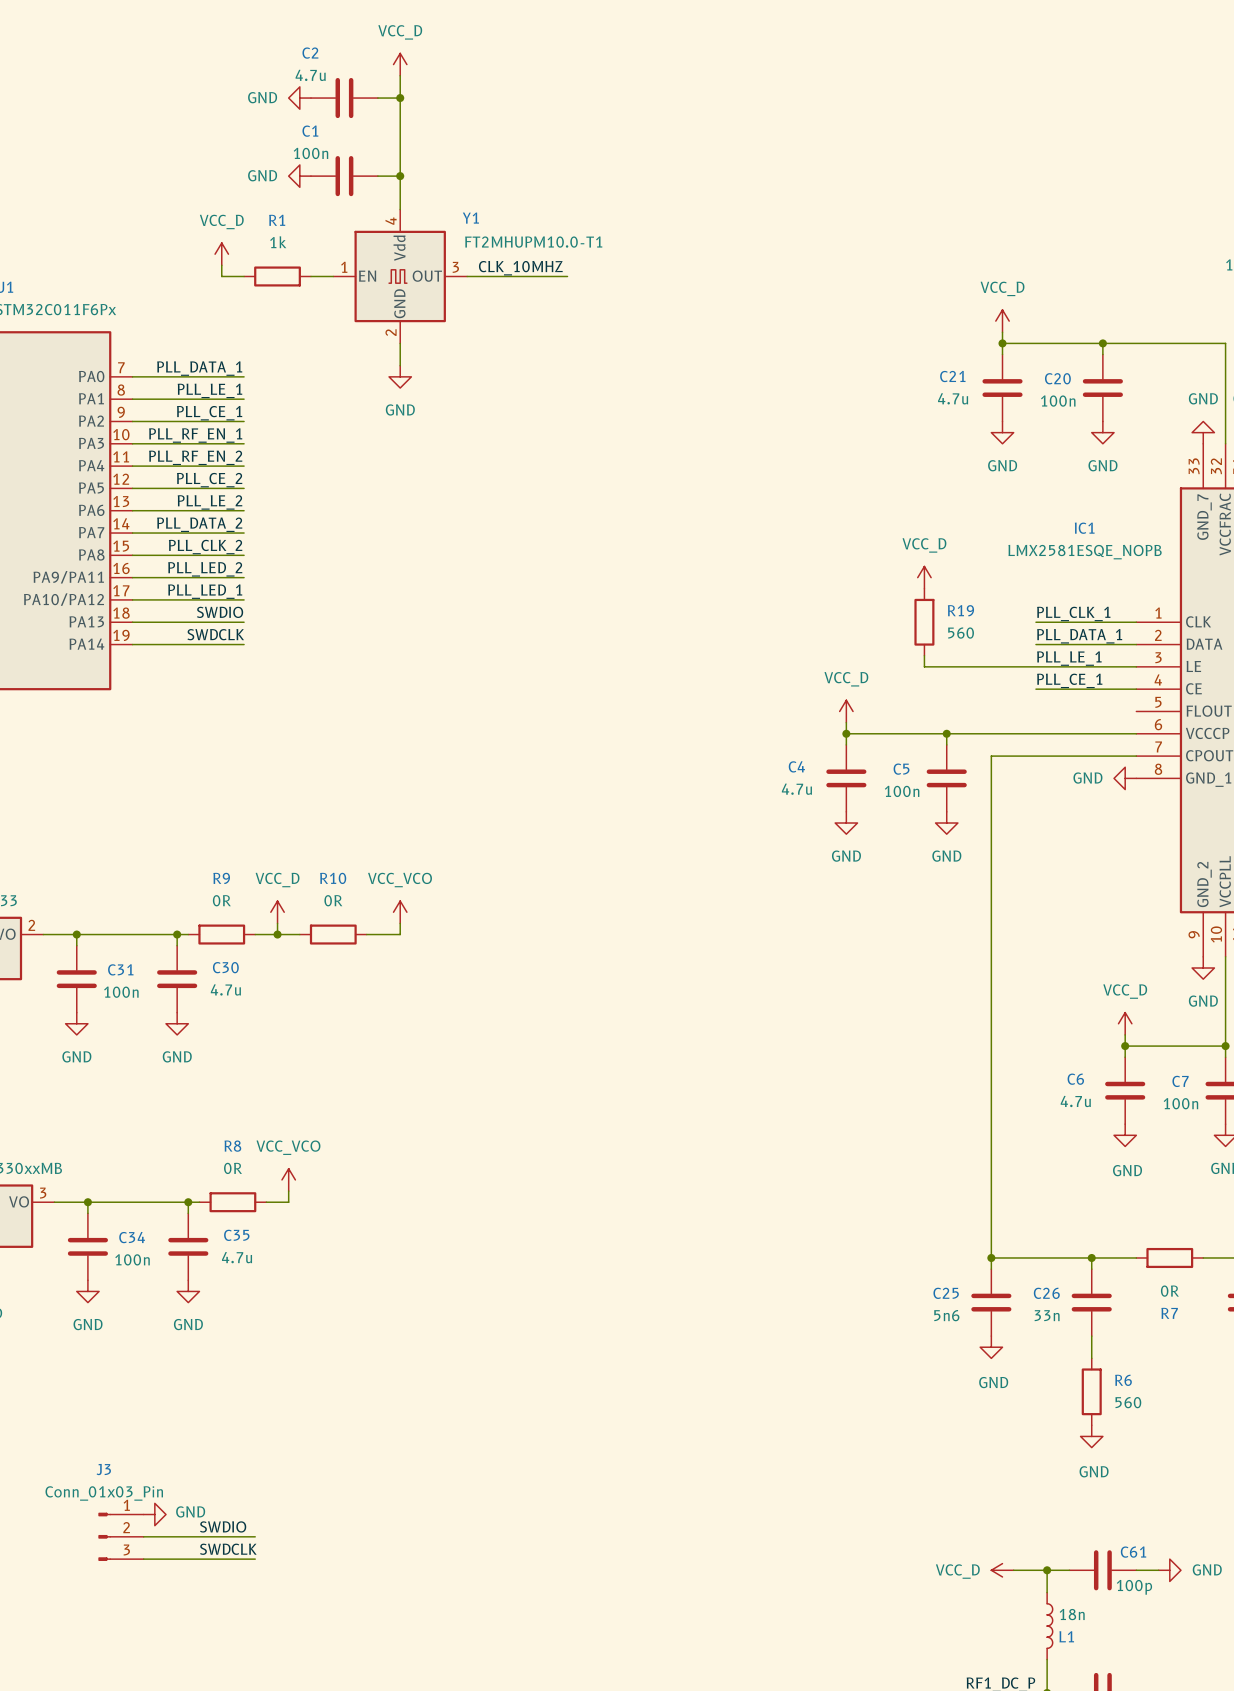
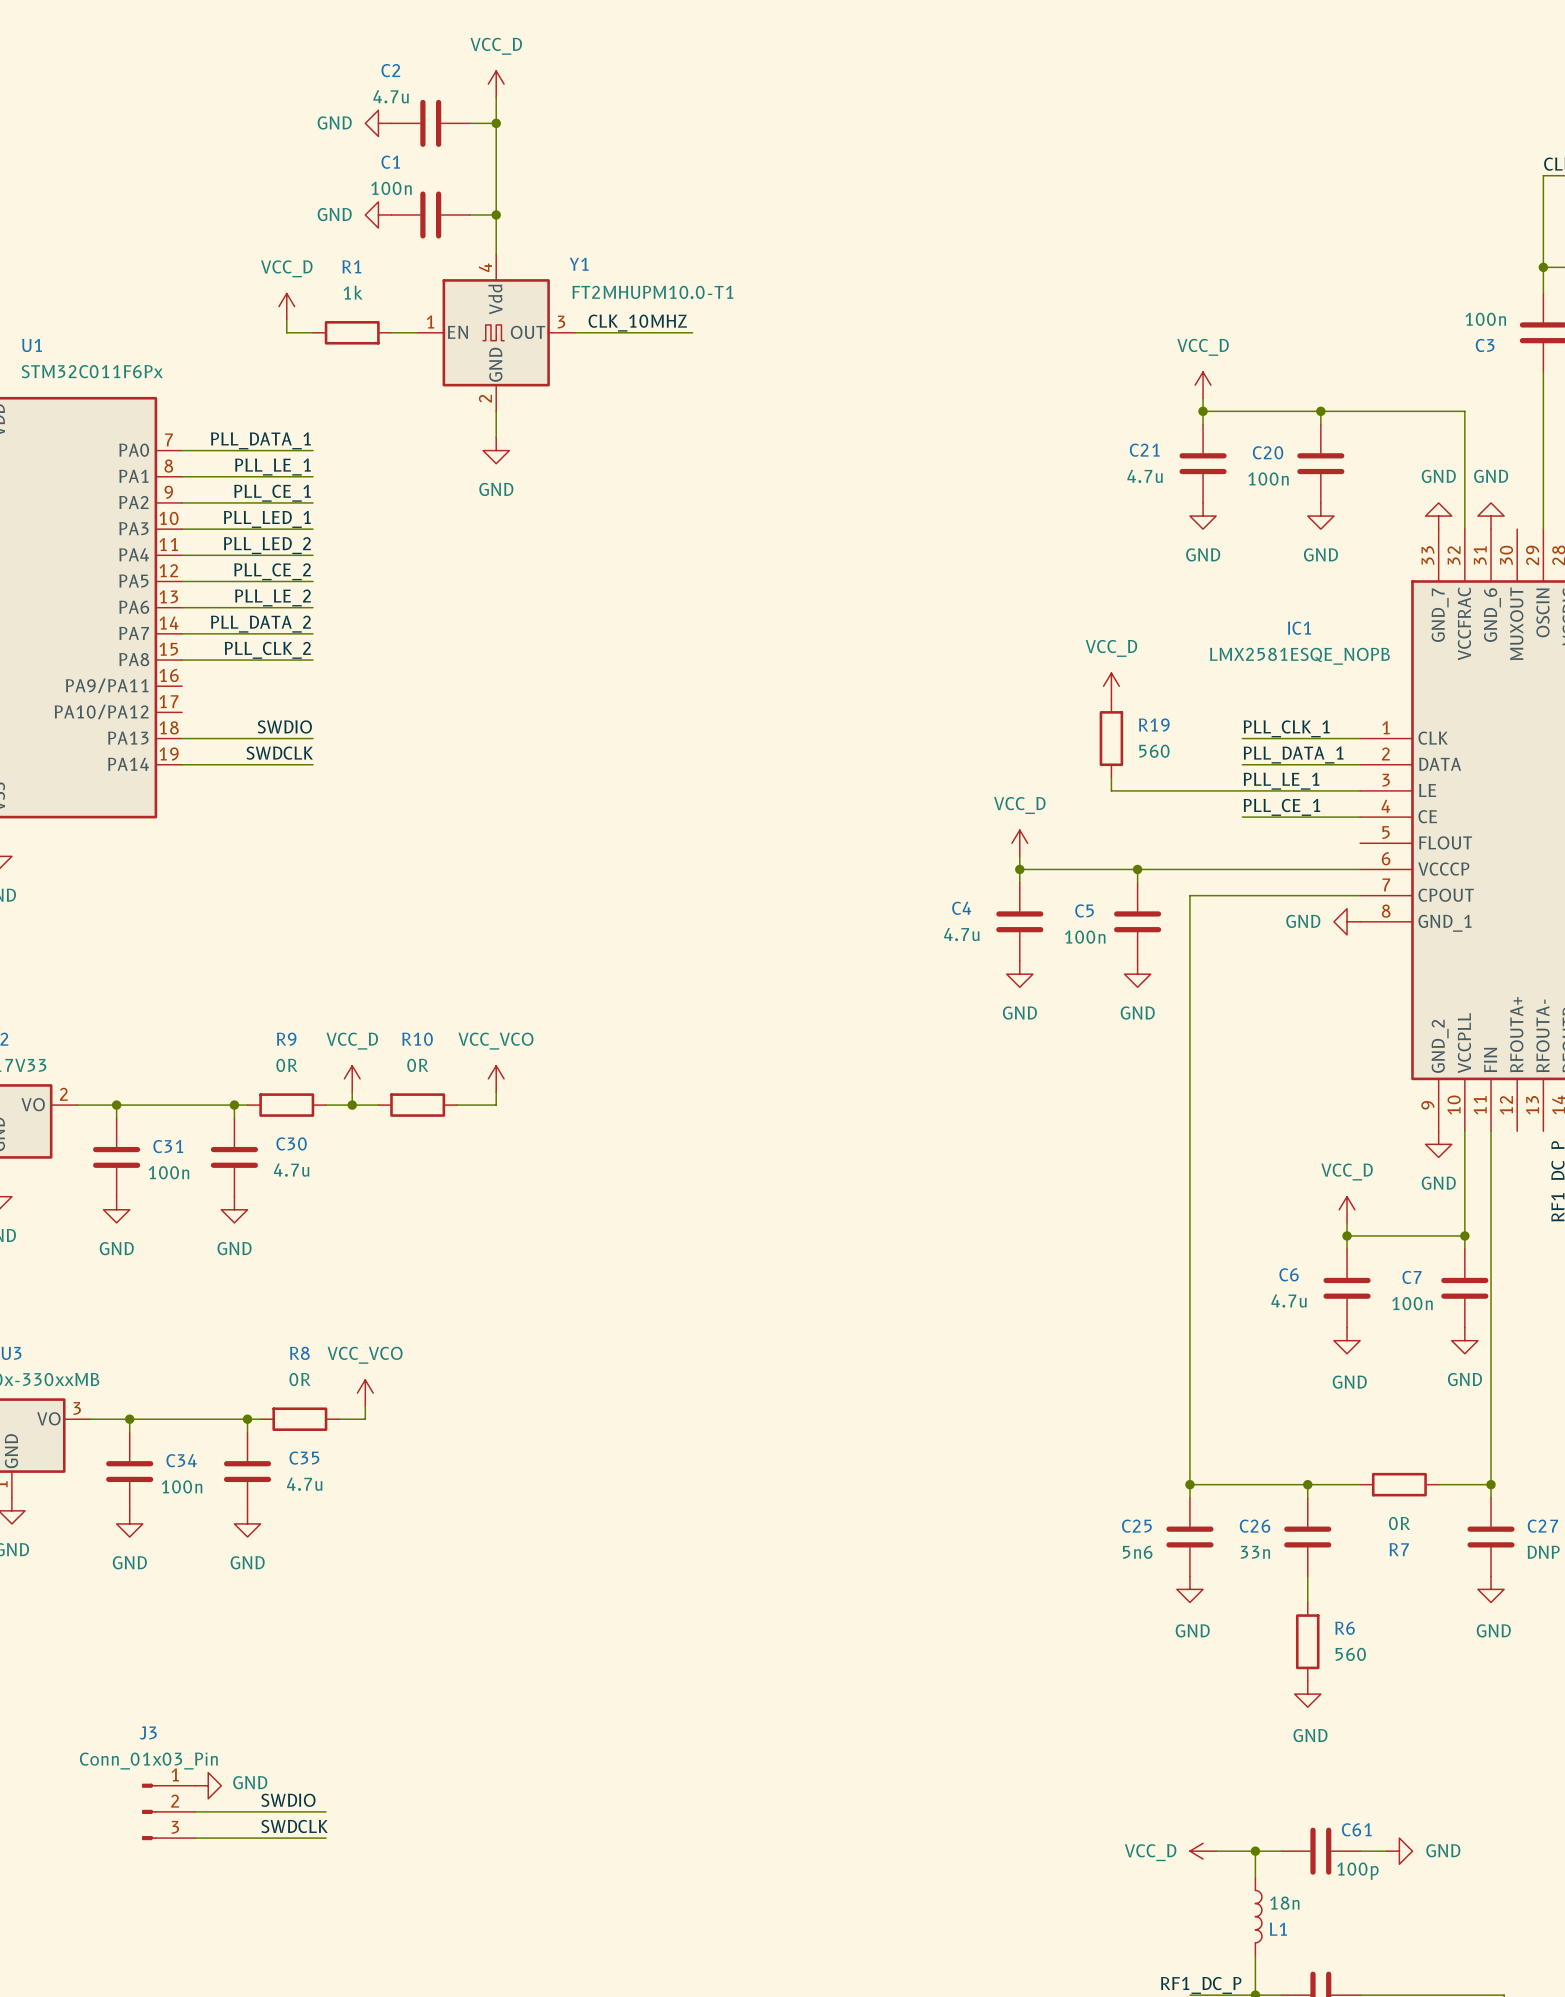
label: PLL_RF_EN_1 (195, 435) -> PLL_LED_1 (267, 519)
label: PLL_RF_EN_2 (195, 457) -> PLL_LED_2 (267, 545)
label: PLL_LED_2 (205, 569) -> none
wire: (132, 577) (244, 577) -> none
label: PLL_LED_1 (205, 591) -> none
wire: (132, 599) (244, 599) -> none

